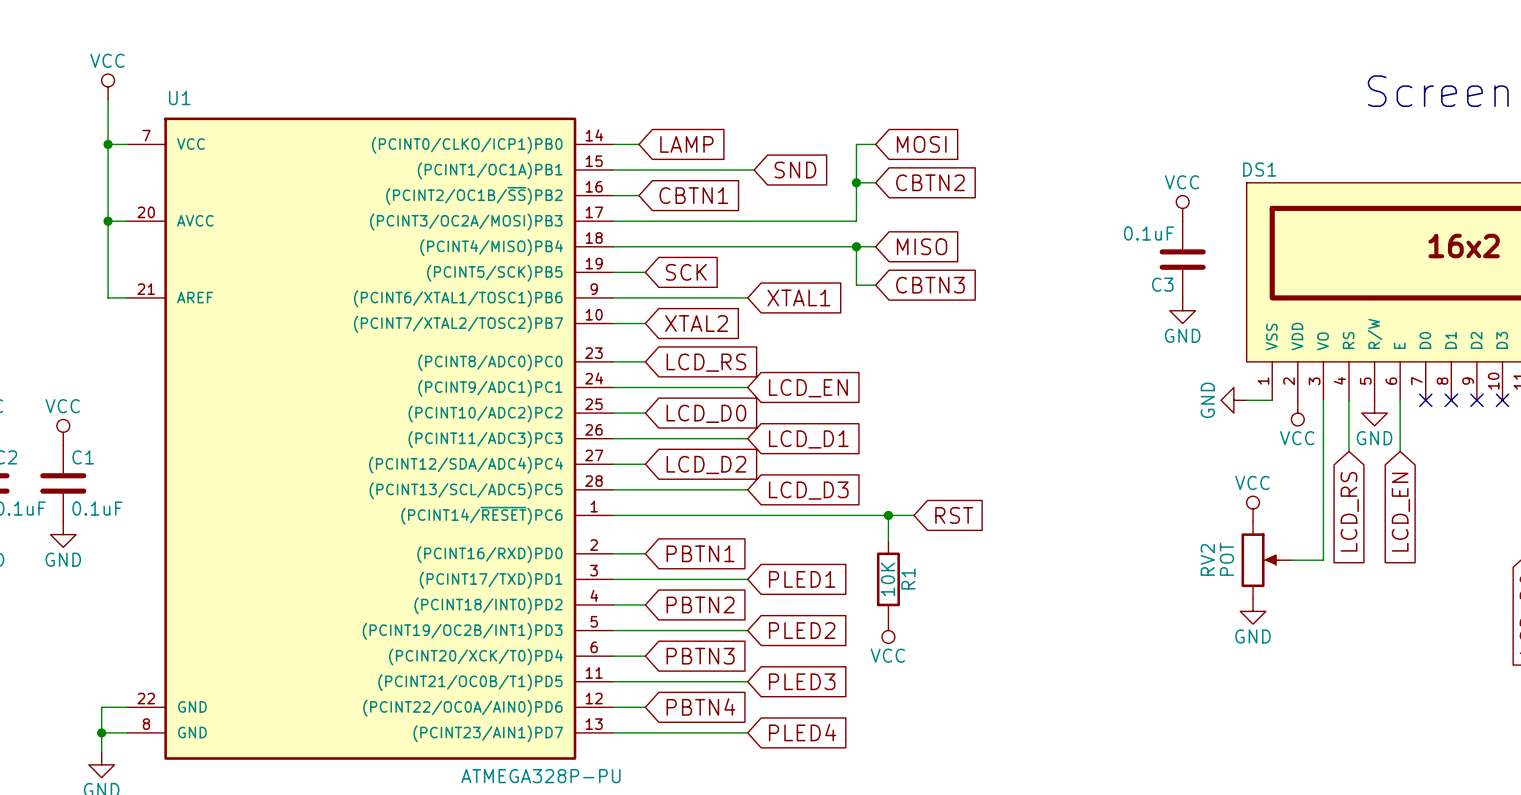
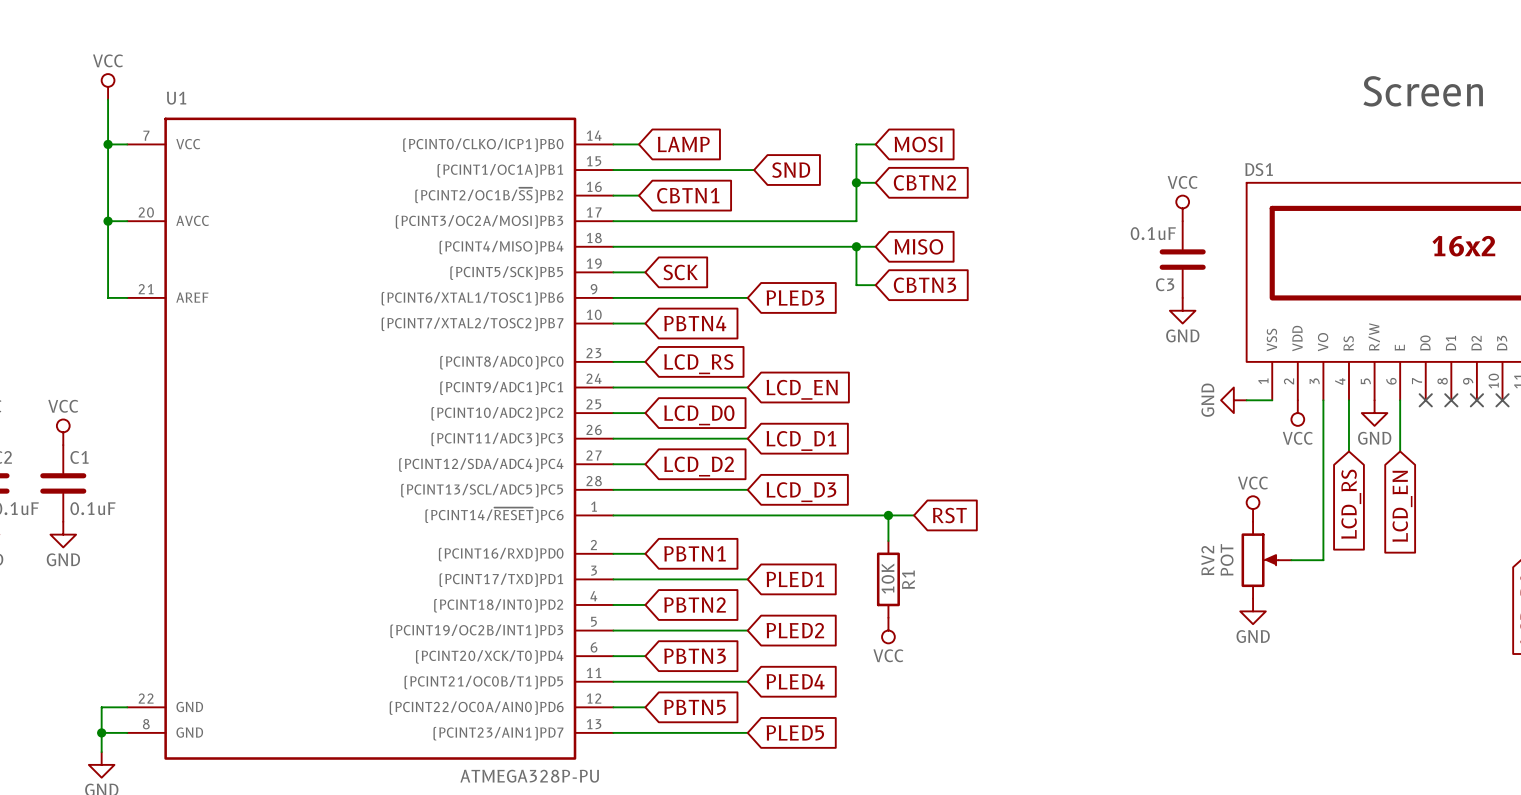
global label: XTAL1 (798, 297) -> PLED3 (795, 297)
global label: XTAL2 (696, 323) -> PBTN4 (695, 323)
global label: PLED3 (802, 681) -> PLED4 (795, 681)
global label: PBTN4 (700, 706) -> PBTN5 (694, 707)
global label: PLED4 (802, 732) -> PLED5 (795, 732)

